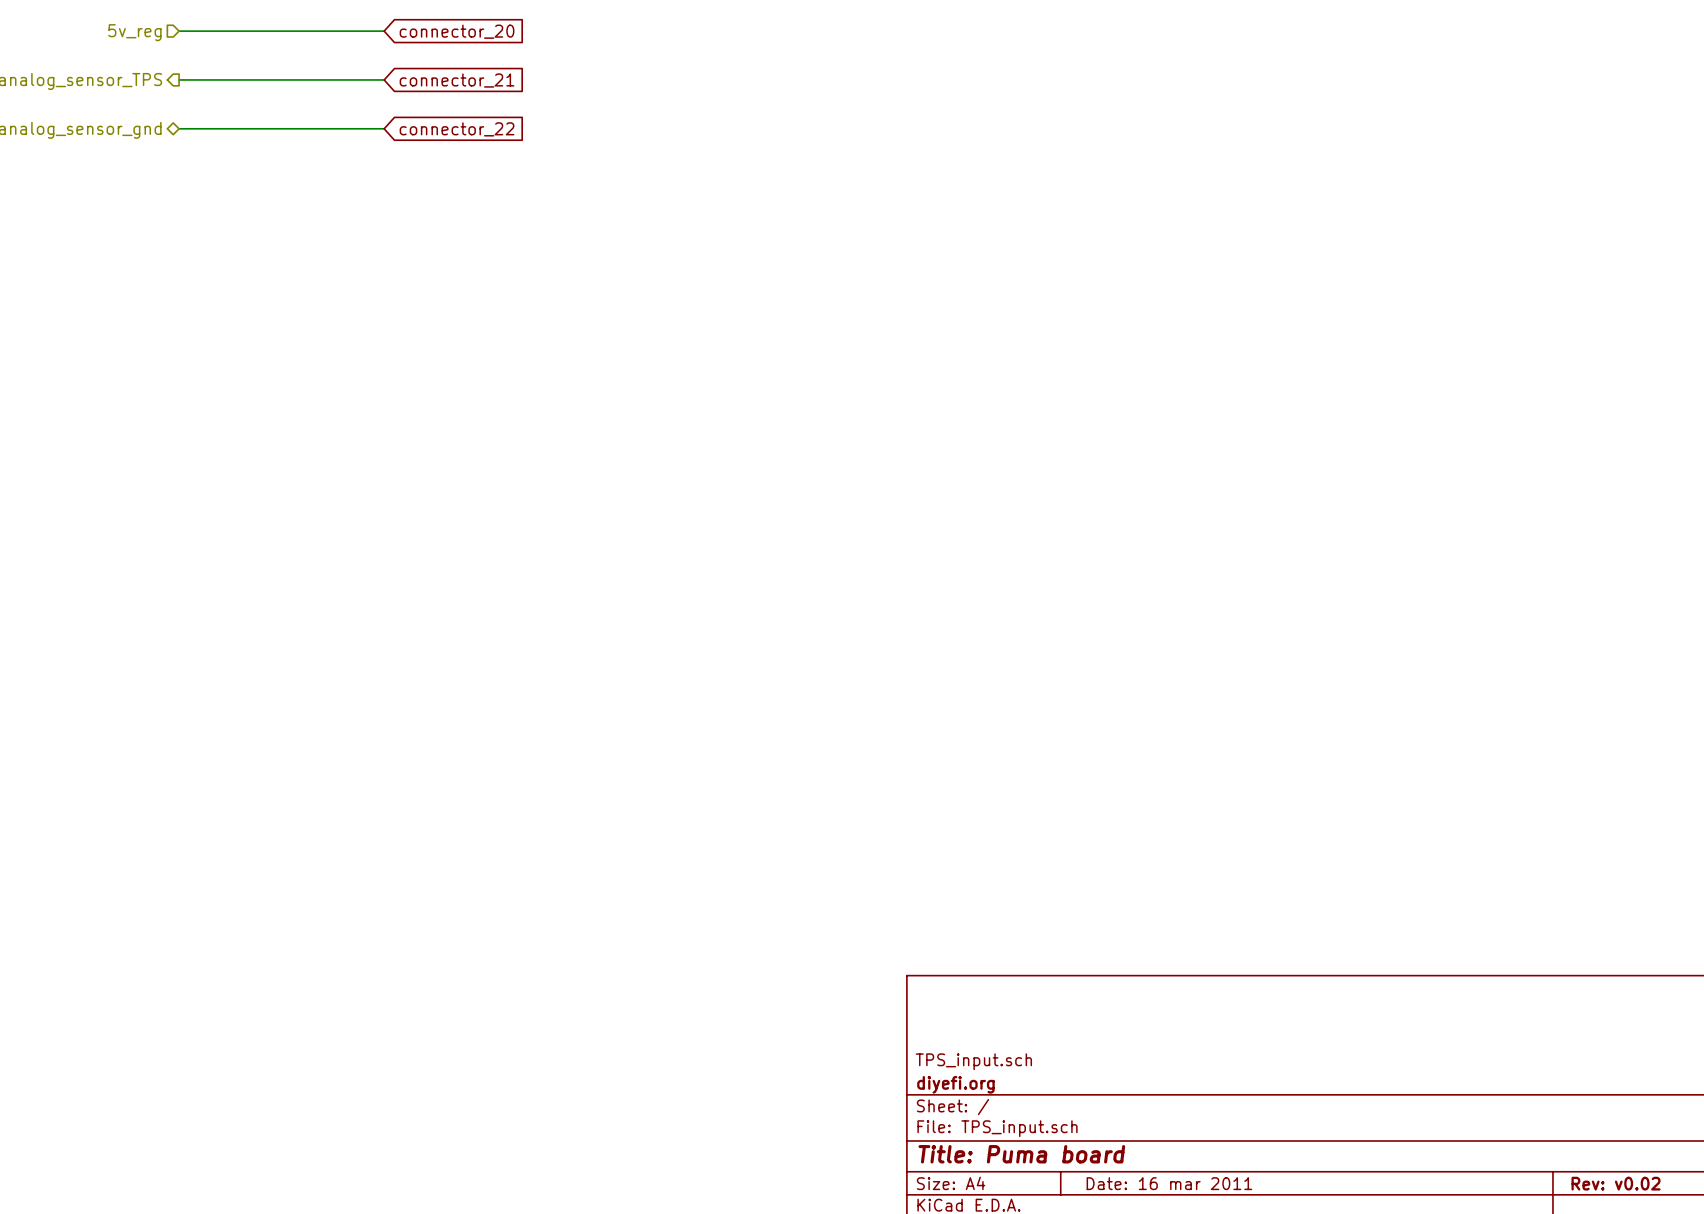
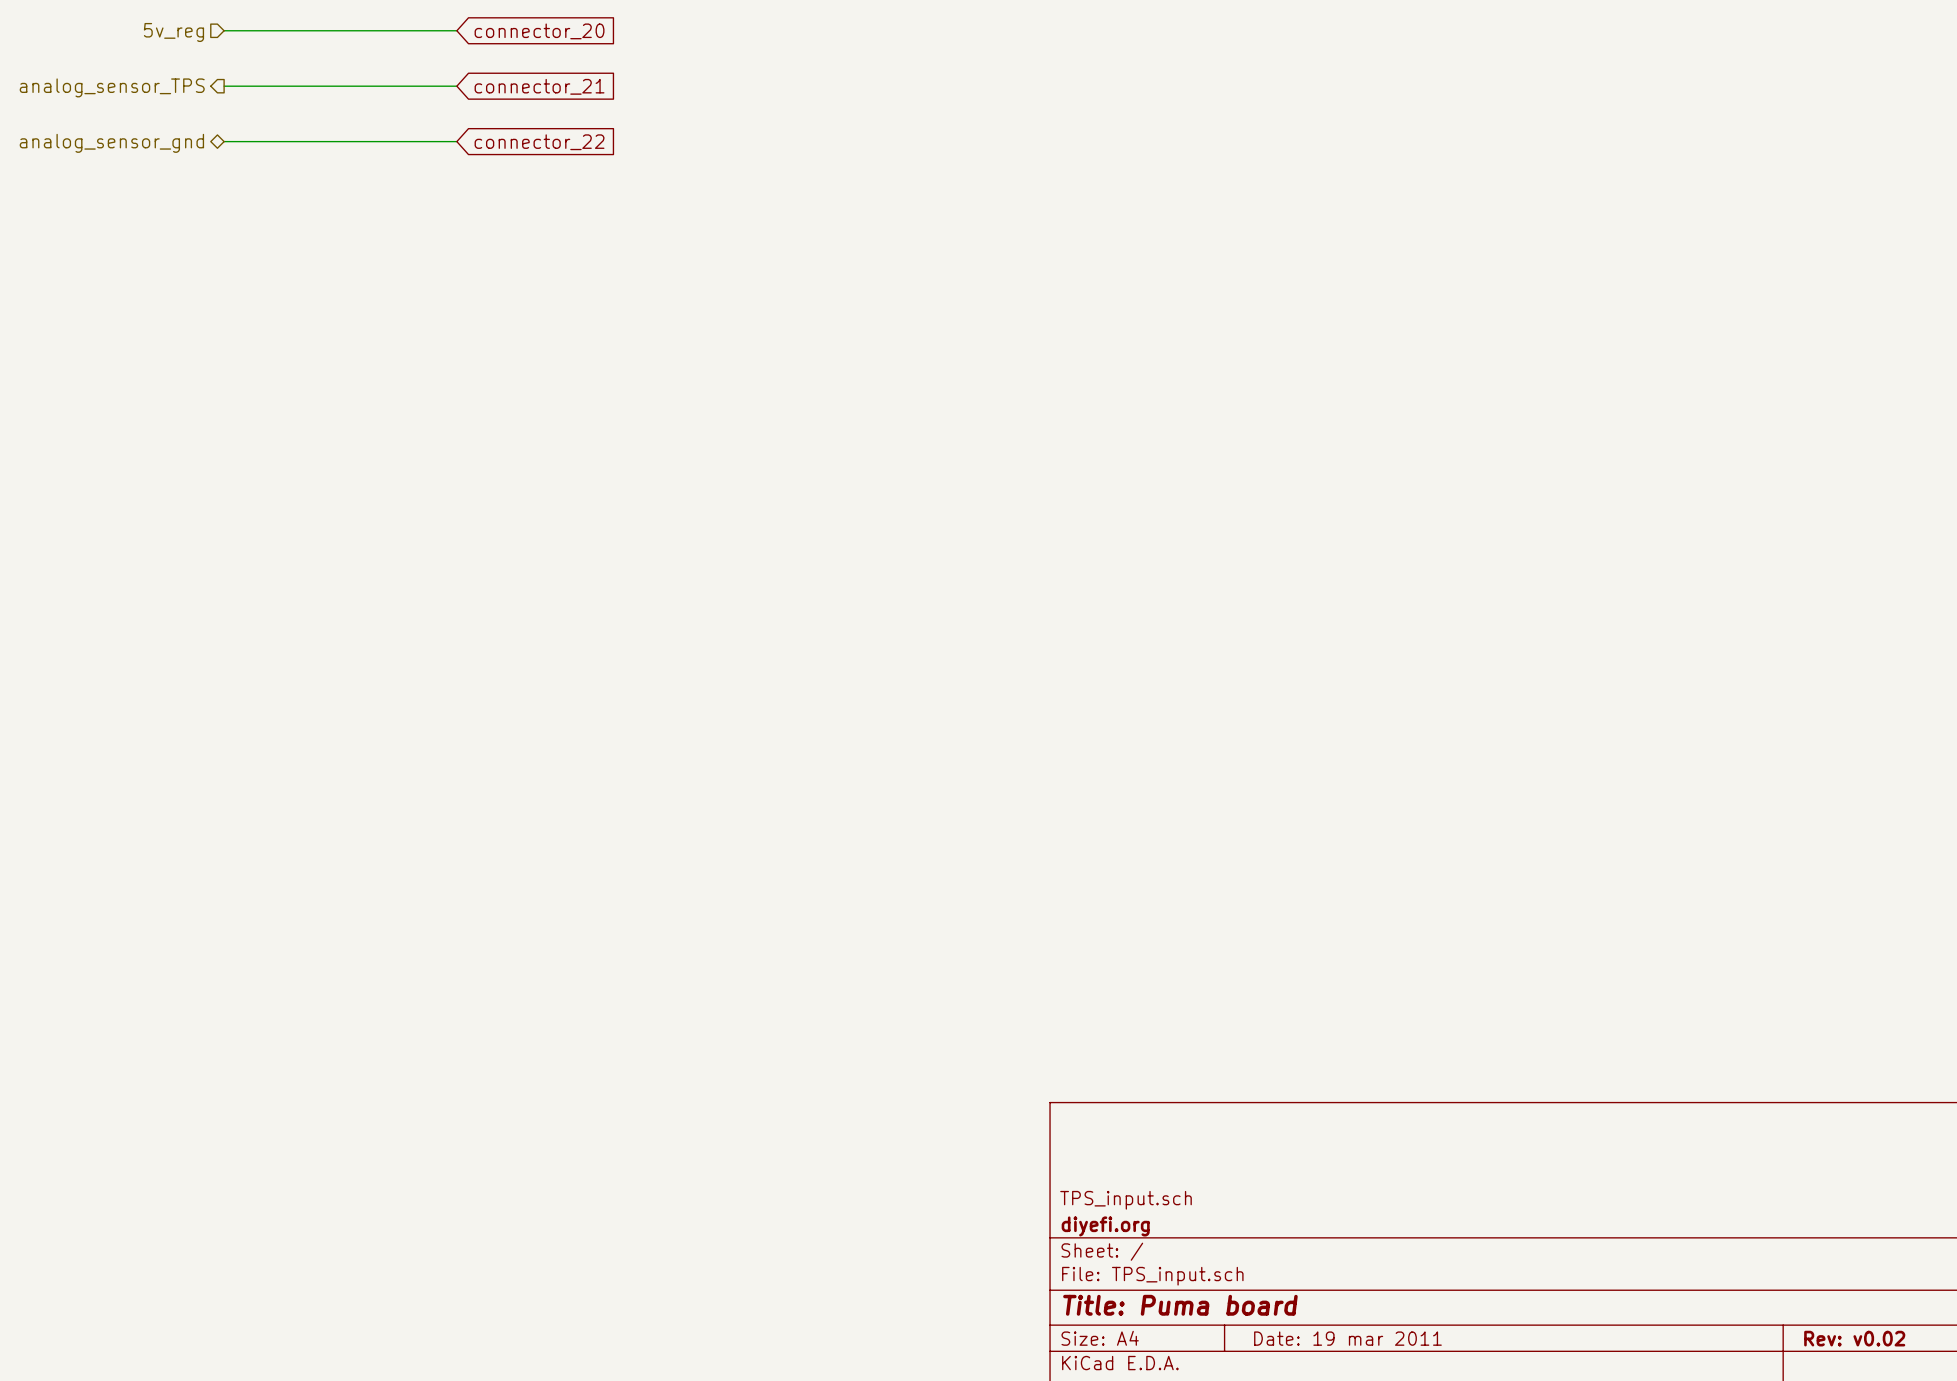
title block: Date: 16 mar 2011 (1169, 1183) -> Date: 19 mar 2011 (1347, 1338)

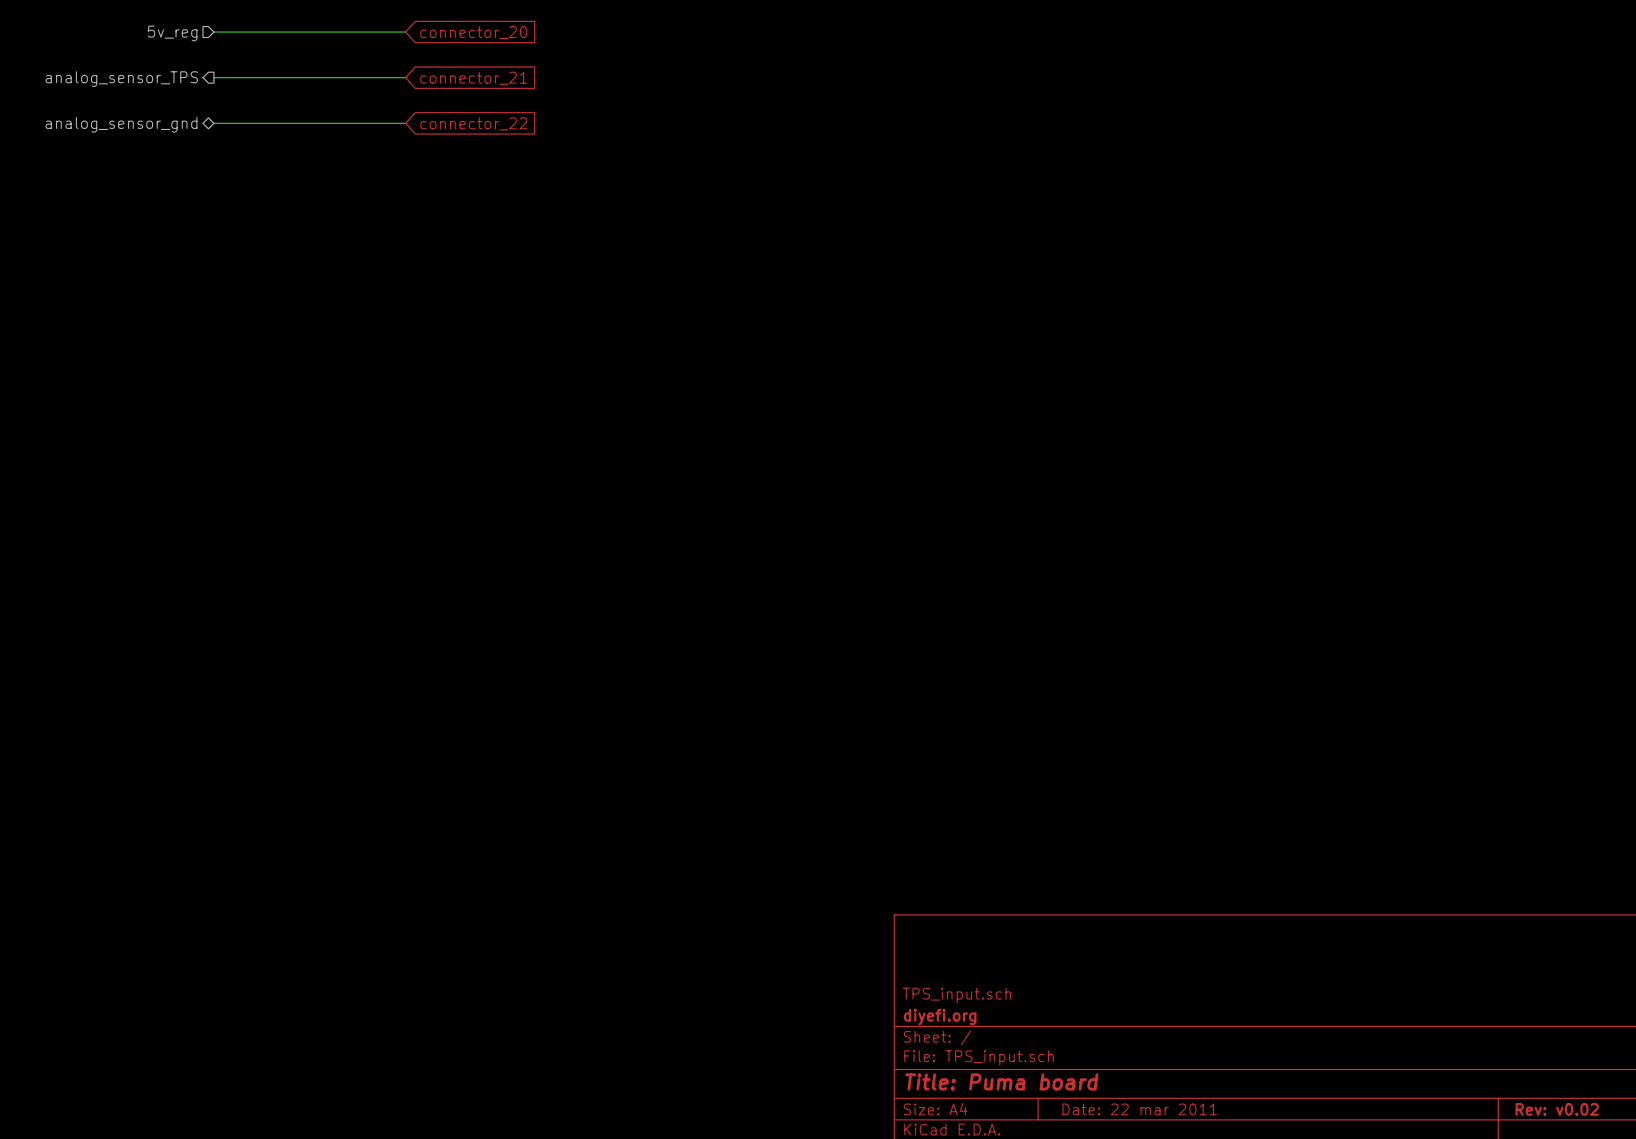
title block: Date: 19 mar 2011 (1347, 1338) -> Date: 22 mar 2011 (1139, 1109)

